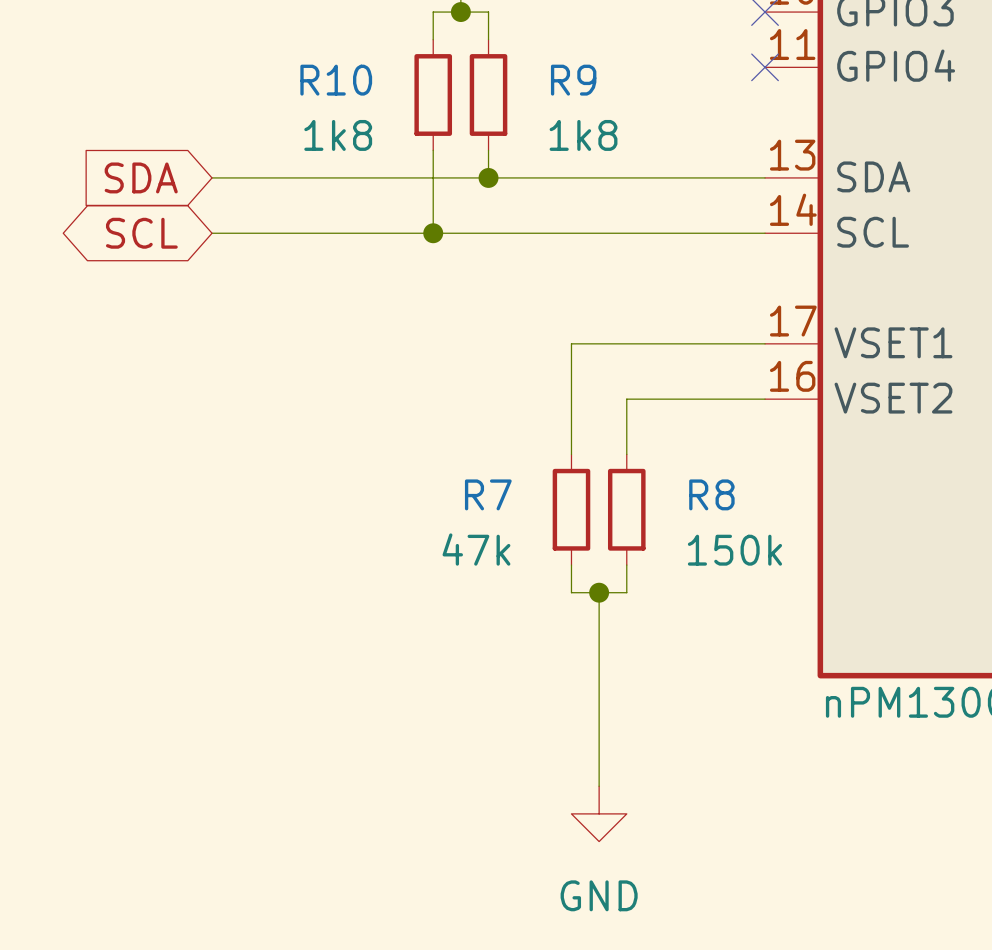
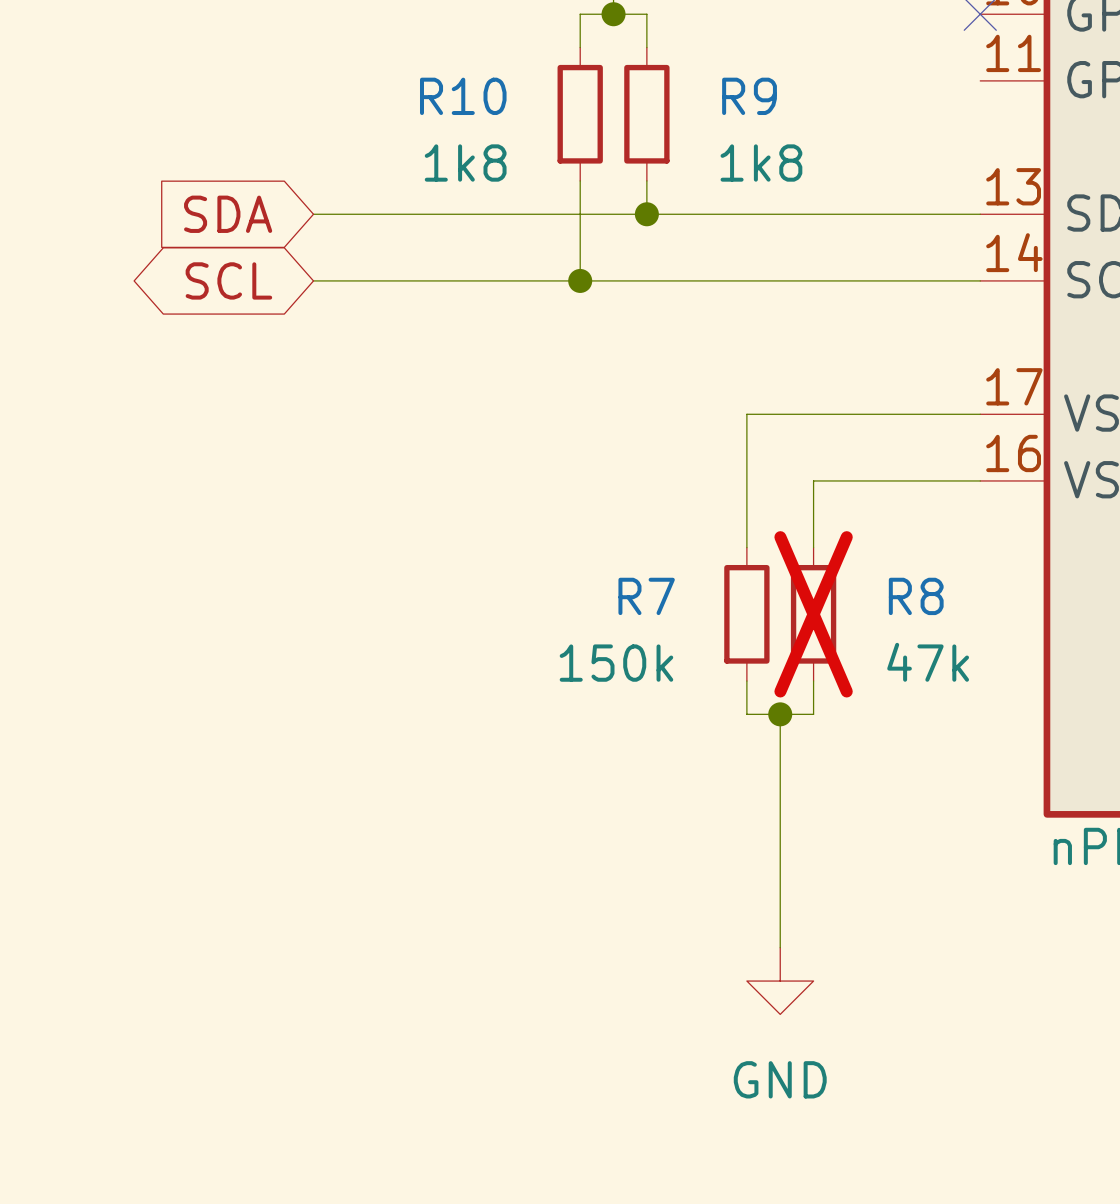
no-connect mark: (765, 67) -> none
R8 do-not-place cross: none -> (813, 614)
R7 value: 47k (476, 549) -> 150k (616, 663)
R8 value: 150k (734, 550) -> 47k (928, 662)

